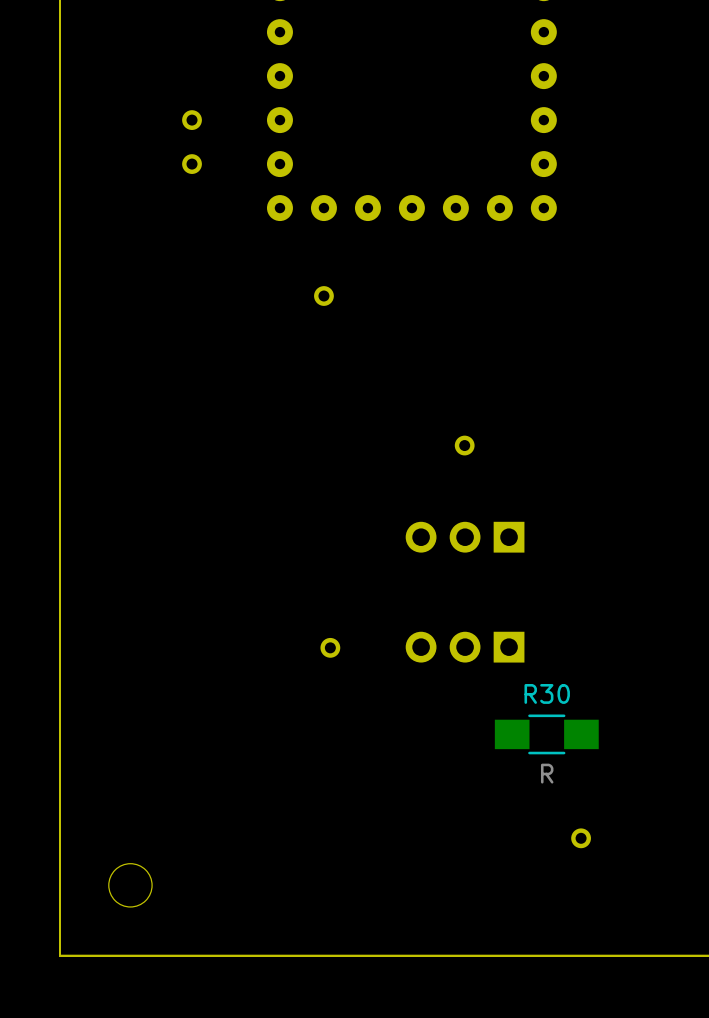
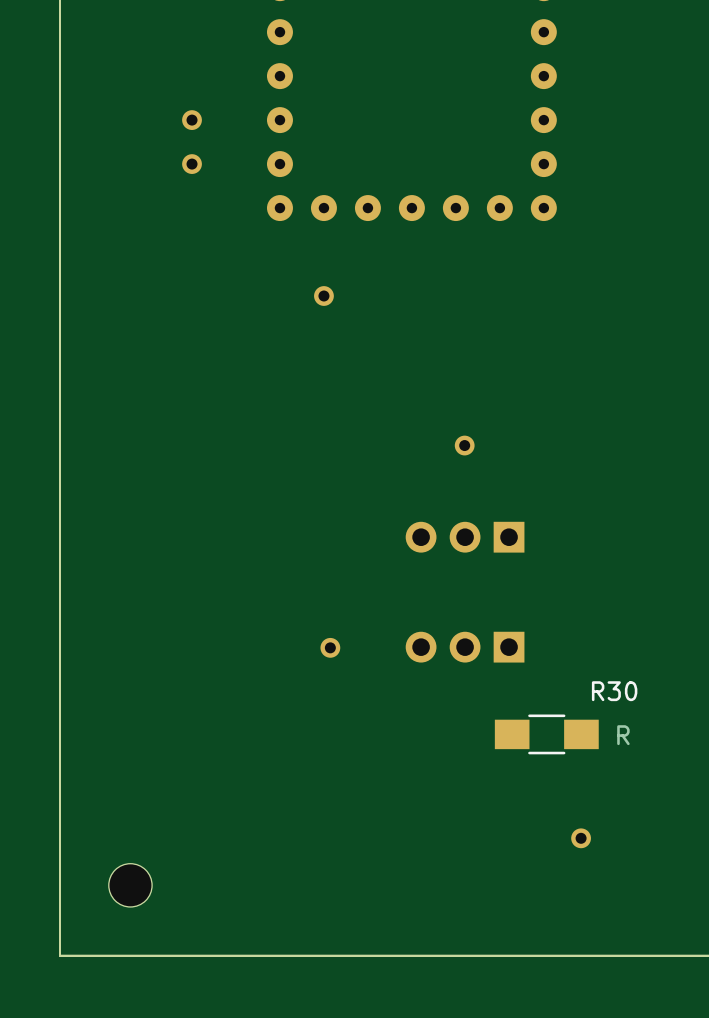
R30 name position: R30 (547, 693) -> R30 (614, 691)
R30 value position: R (547, 773) -> R (623, 735)

